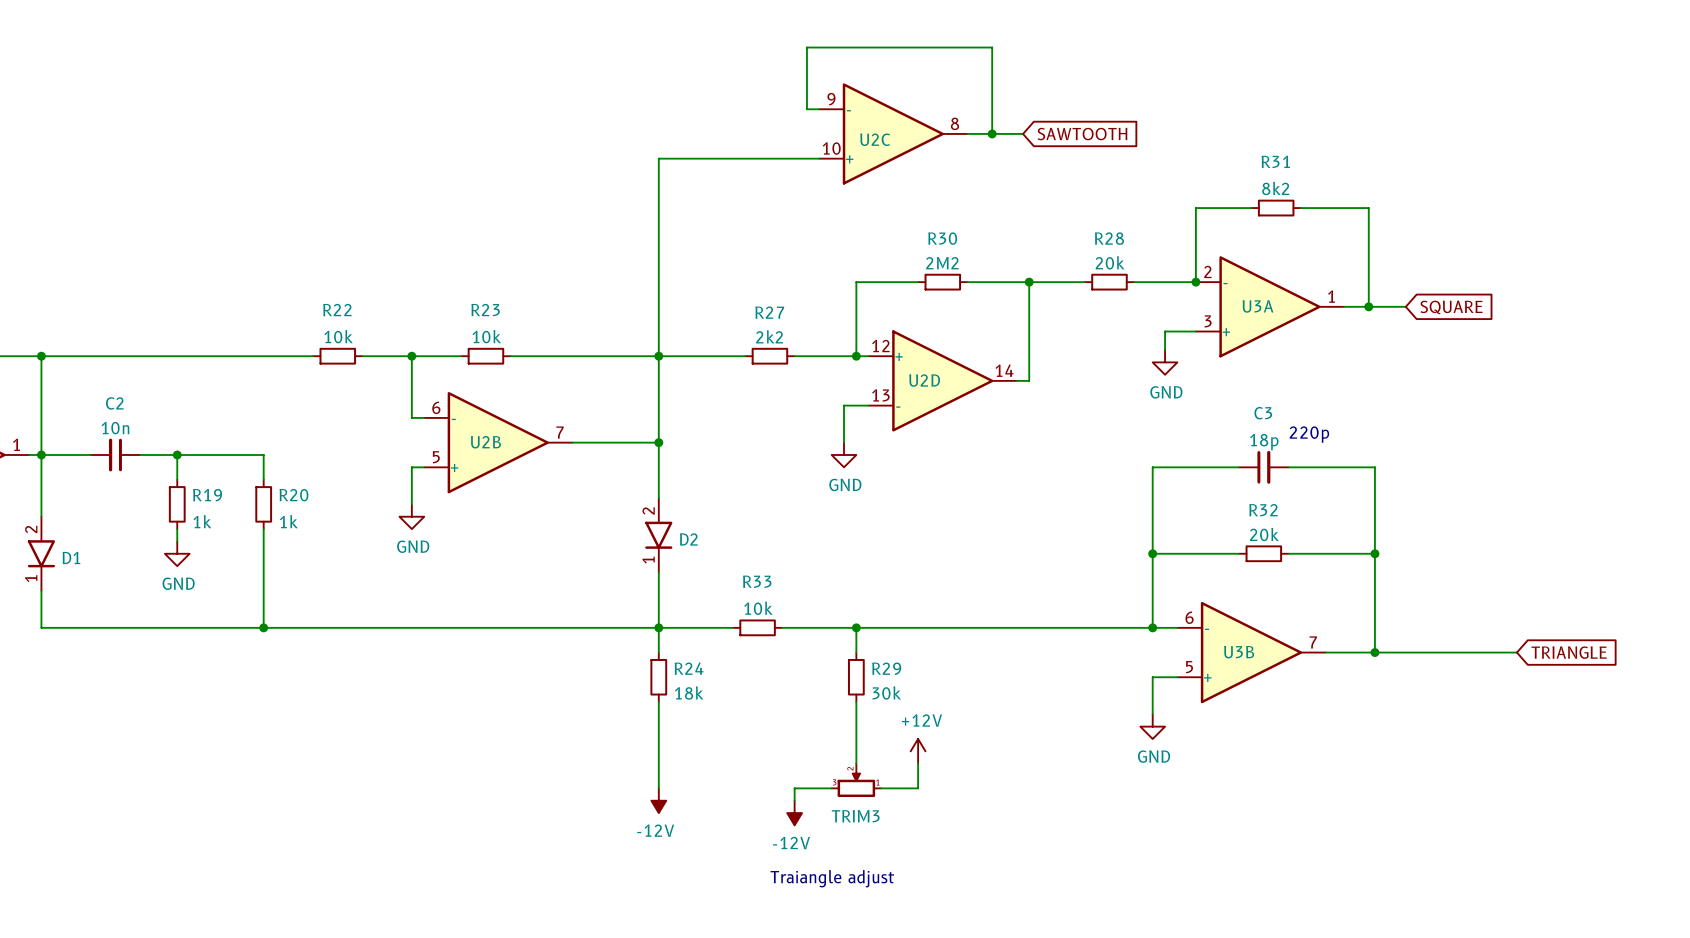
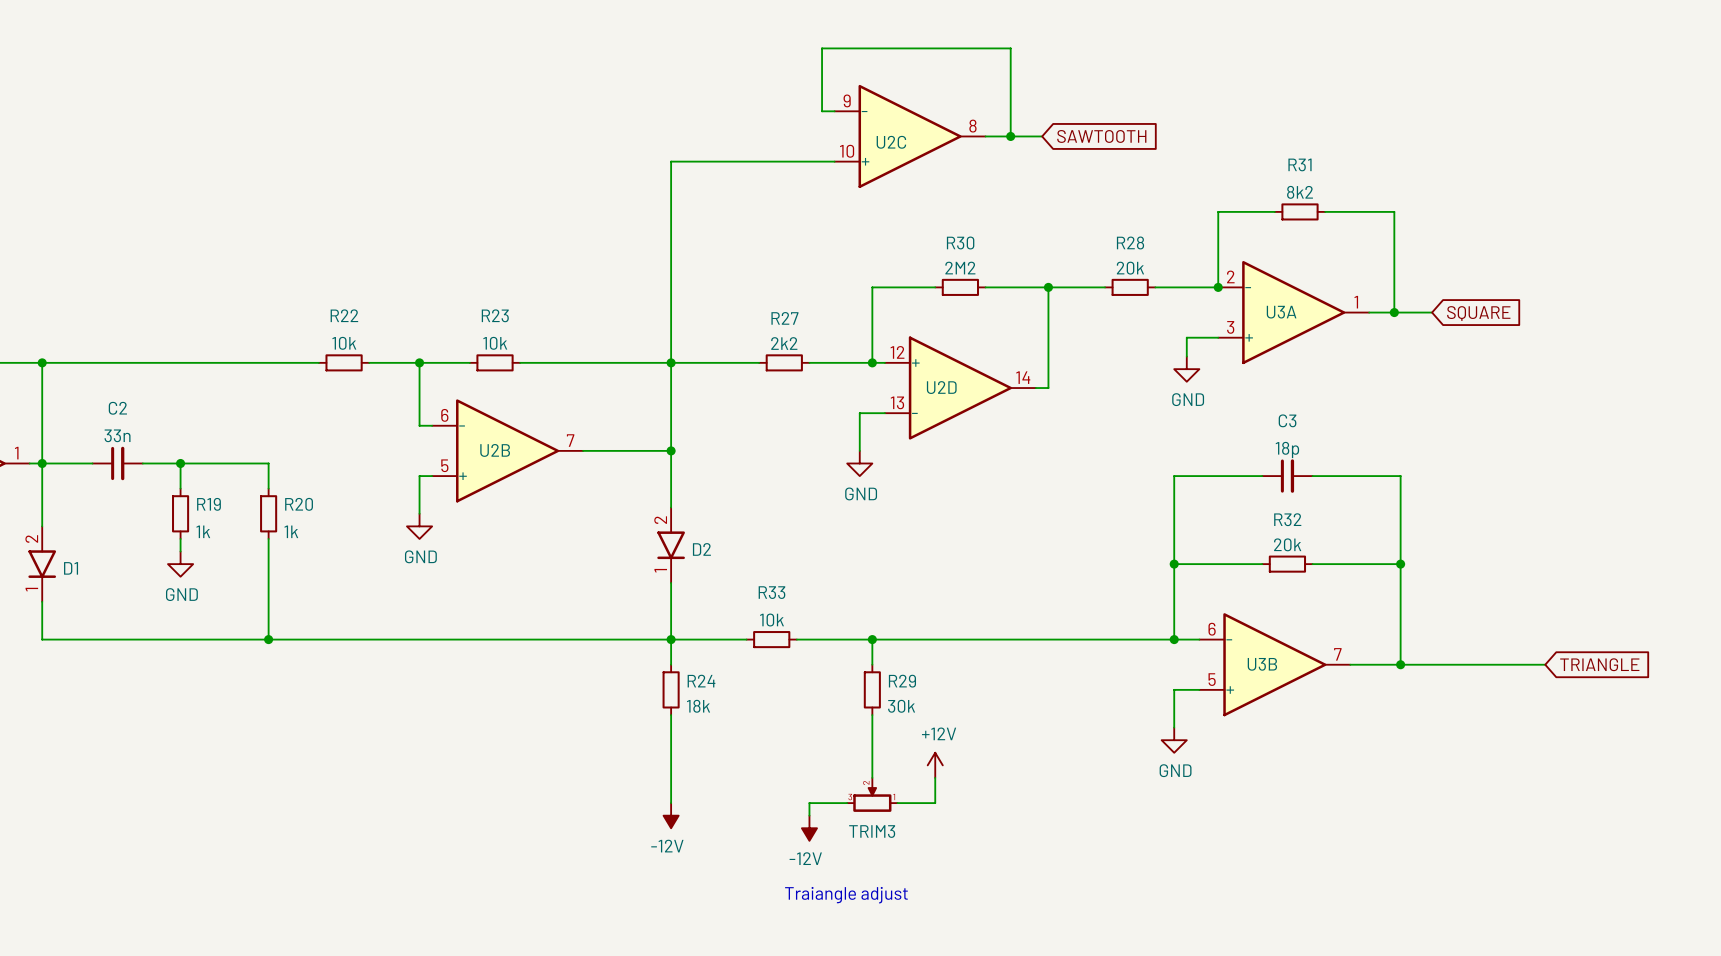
C2 value: 10n (115, 428) -> 33n (117, 435)
text: 220p (1309, 434) -> none
C2 rotation: 0° (115, 454) -> 180° (117, 463)

